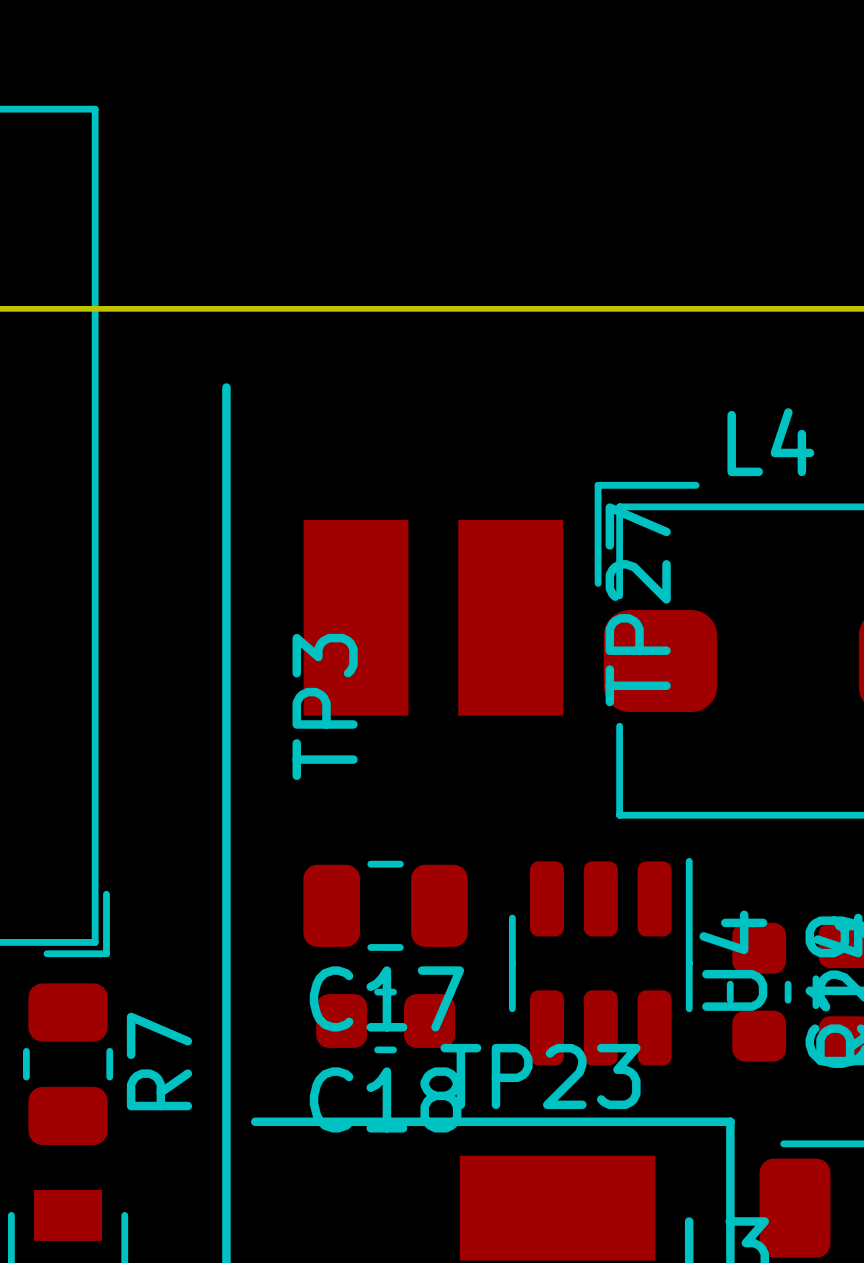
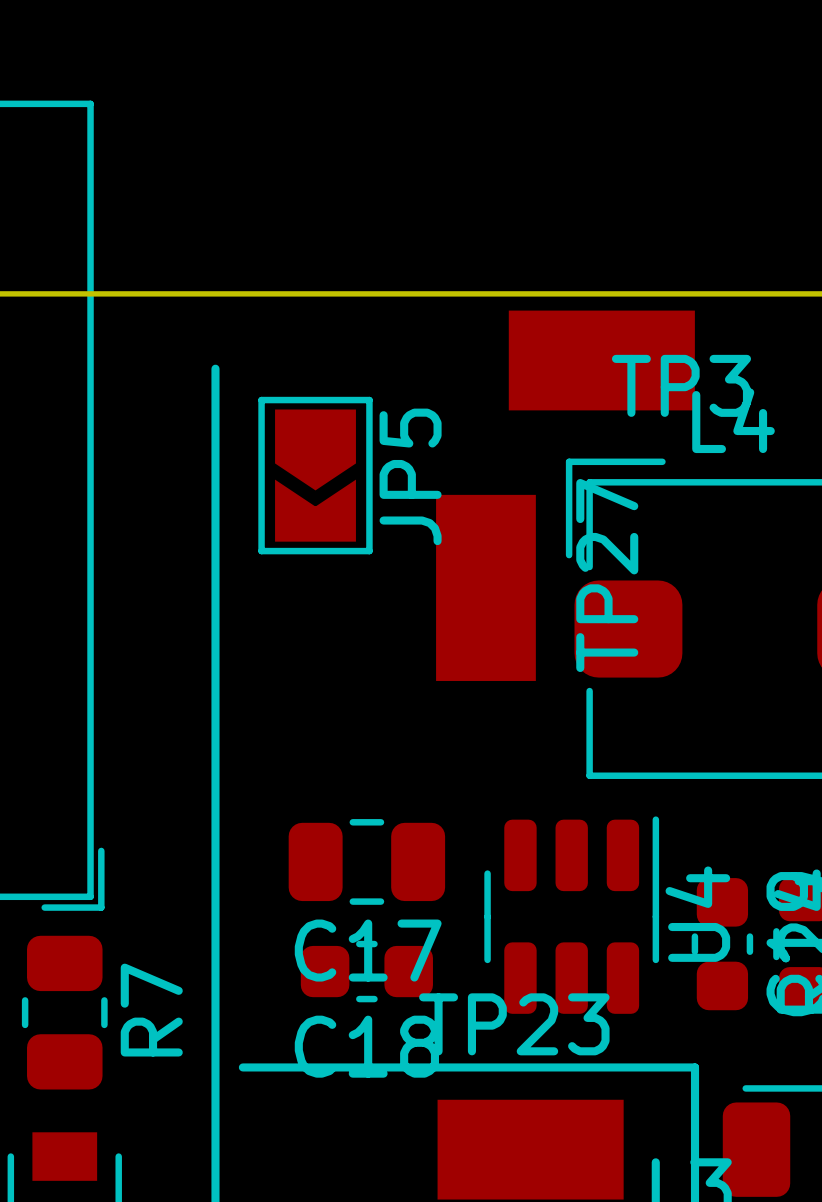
JP5: none -> (315, 475)
TP3 rotation: 0° (356, 617) -> 90° clockwise (601, 360)
TP3 position: (356, 617) -> (601, 360)
TP3 name position: TP3 (325, 706) -> TP3 (681, 385)

